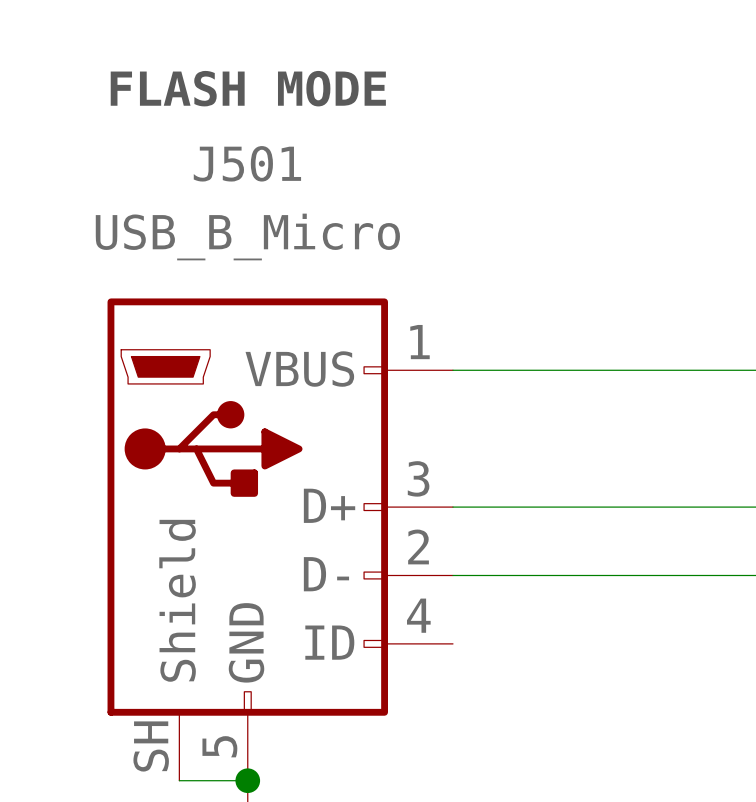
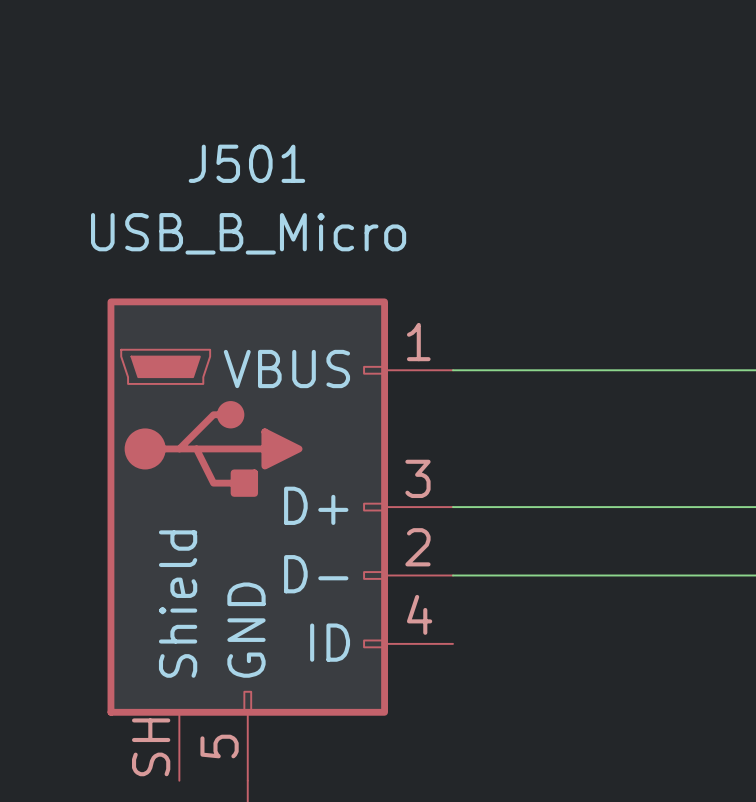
text: FLASH MODE (248, 88) -> none
wire: (179, 780) (247, 780) -> none
junction: (247, 780) -> none

